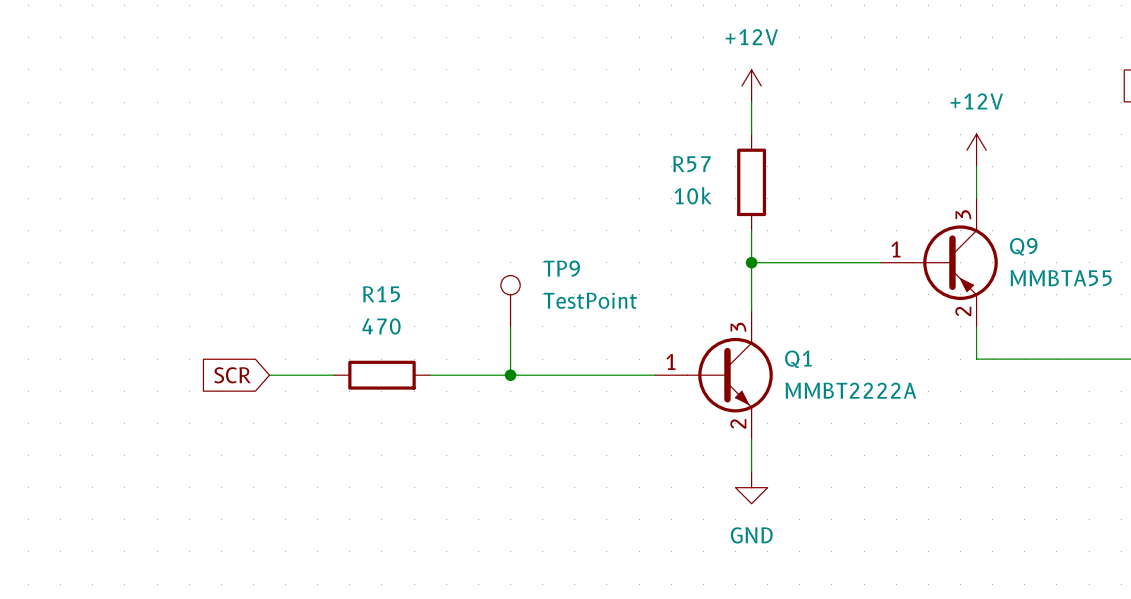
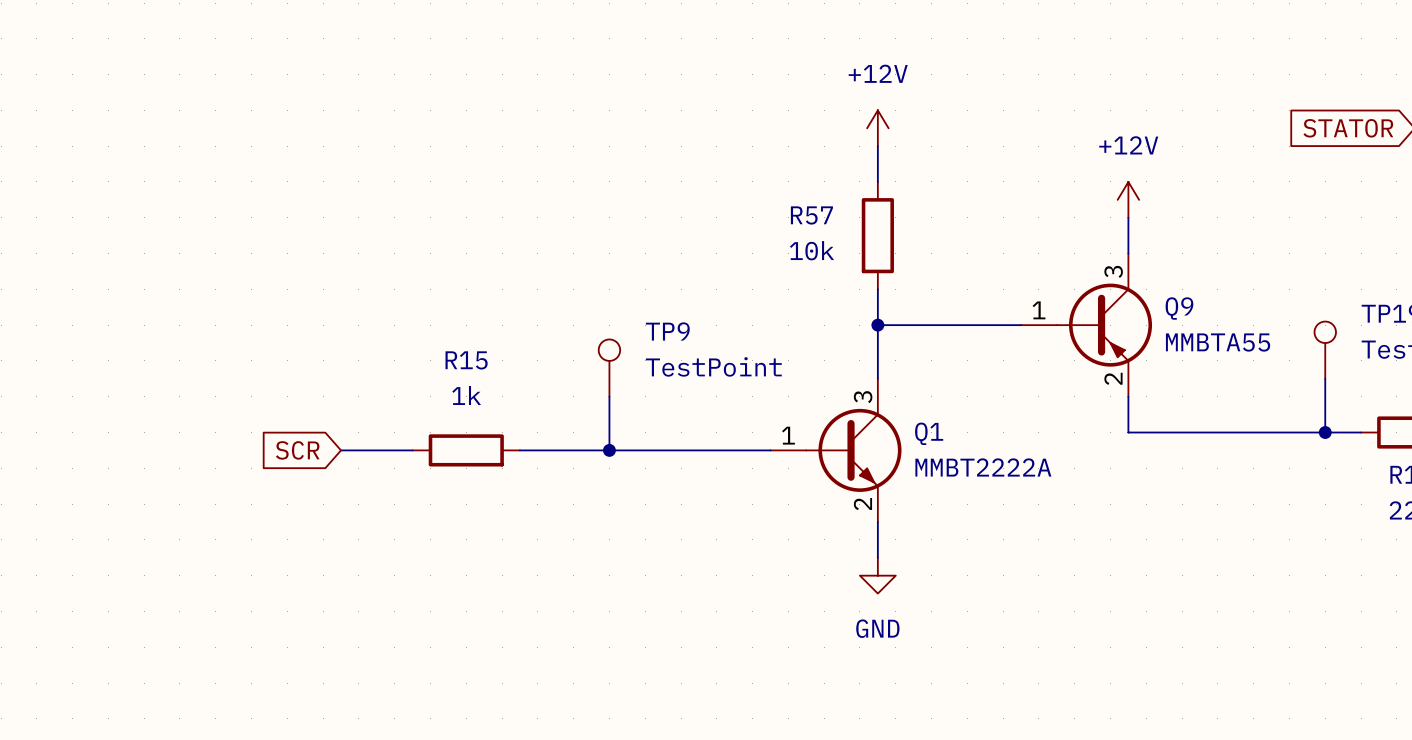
R15 value: 470 (381, 326) -> 1k (466, 395)

